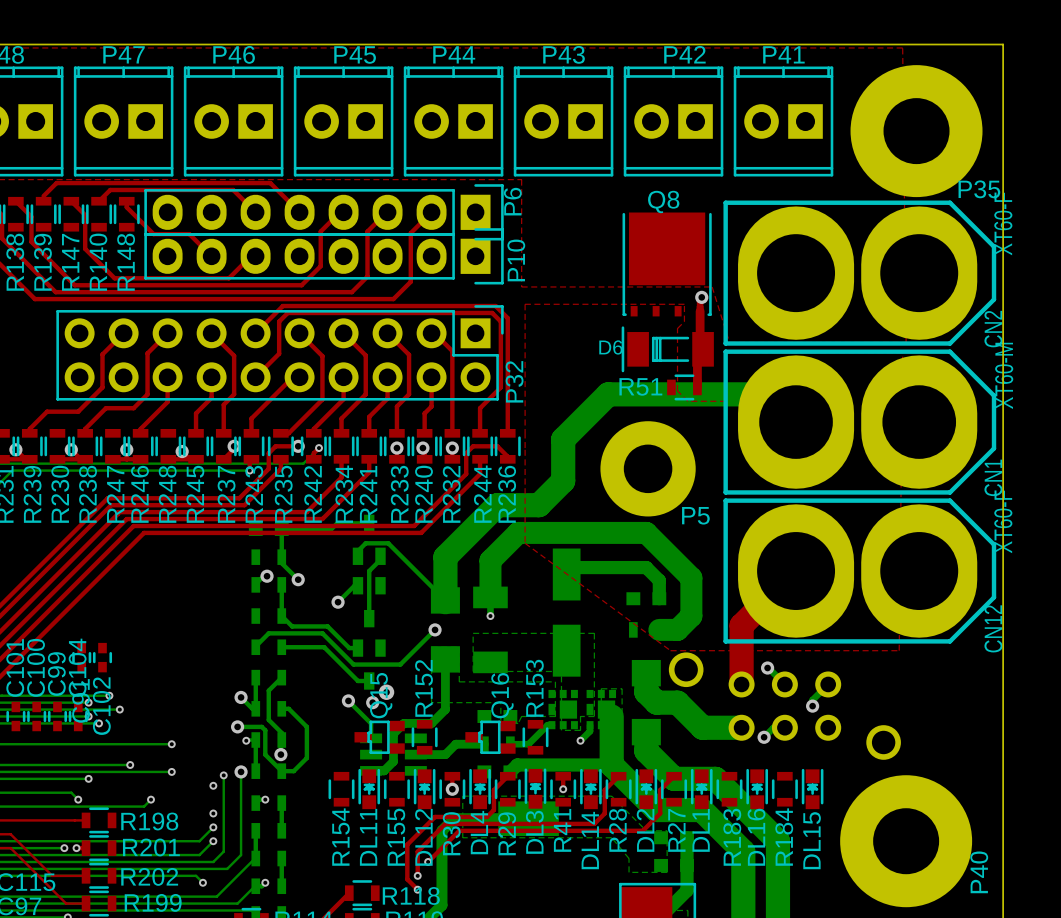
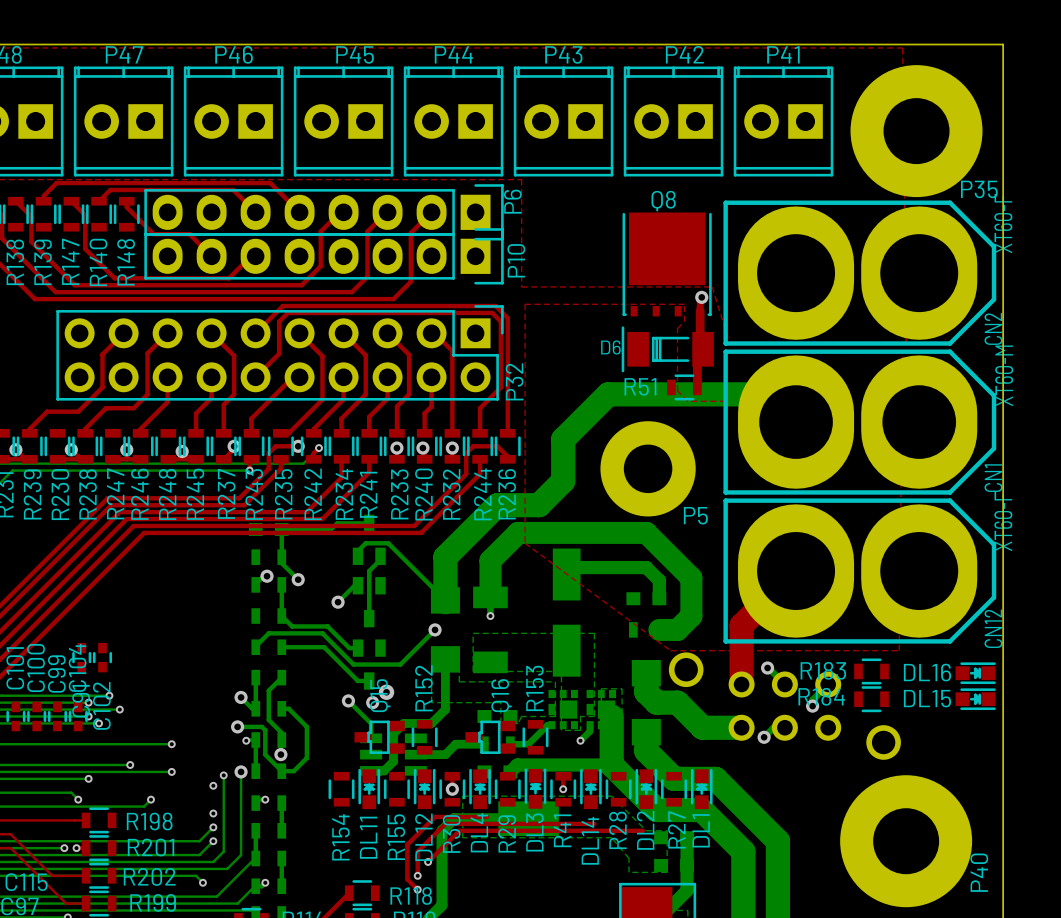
top track: (507, 776) (493, 790) (493, 810) (487, 816) -> none
top track: (618, 776) (604, 790) (604, 813) (594, 823) -> none
top track: (674, 776) (660, 790) (660, 813) (642, 830) -> none
R183 rotation: 0° (729, 789) -> 90° clockwise (871, 671)
R183 position: (729, 789) -> (871, 671)
DL16 rotation: 0° (757, 789) -> 90° clockwise (975, 673)
DL16 position: (757, 789) -> (975, 673)
R184 rotation: 0° (784, 789) -> 90° clockwise (871, 699)
R184 position: (784, 789) -> (871, 699)
DL15 rotation: 0° (812, 789) -> 90° clockwise (975, 699)
DL15 position: (812, 789) -> (975, 699)

